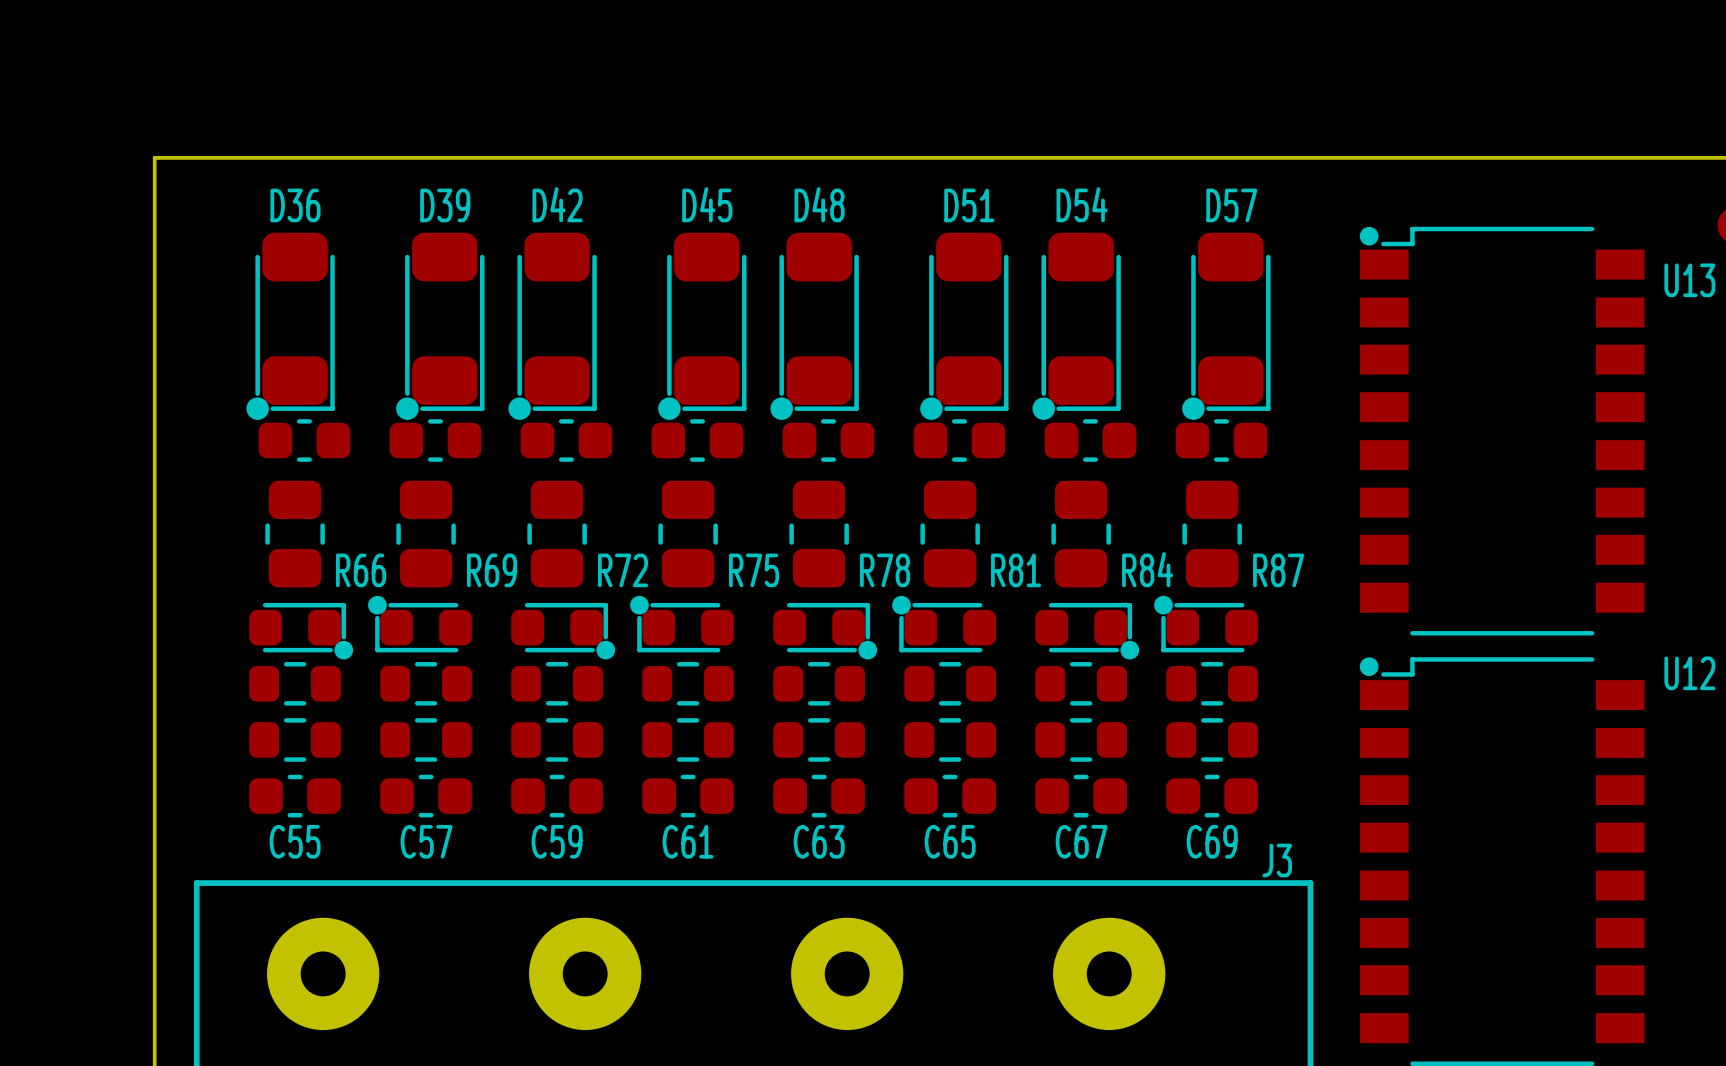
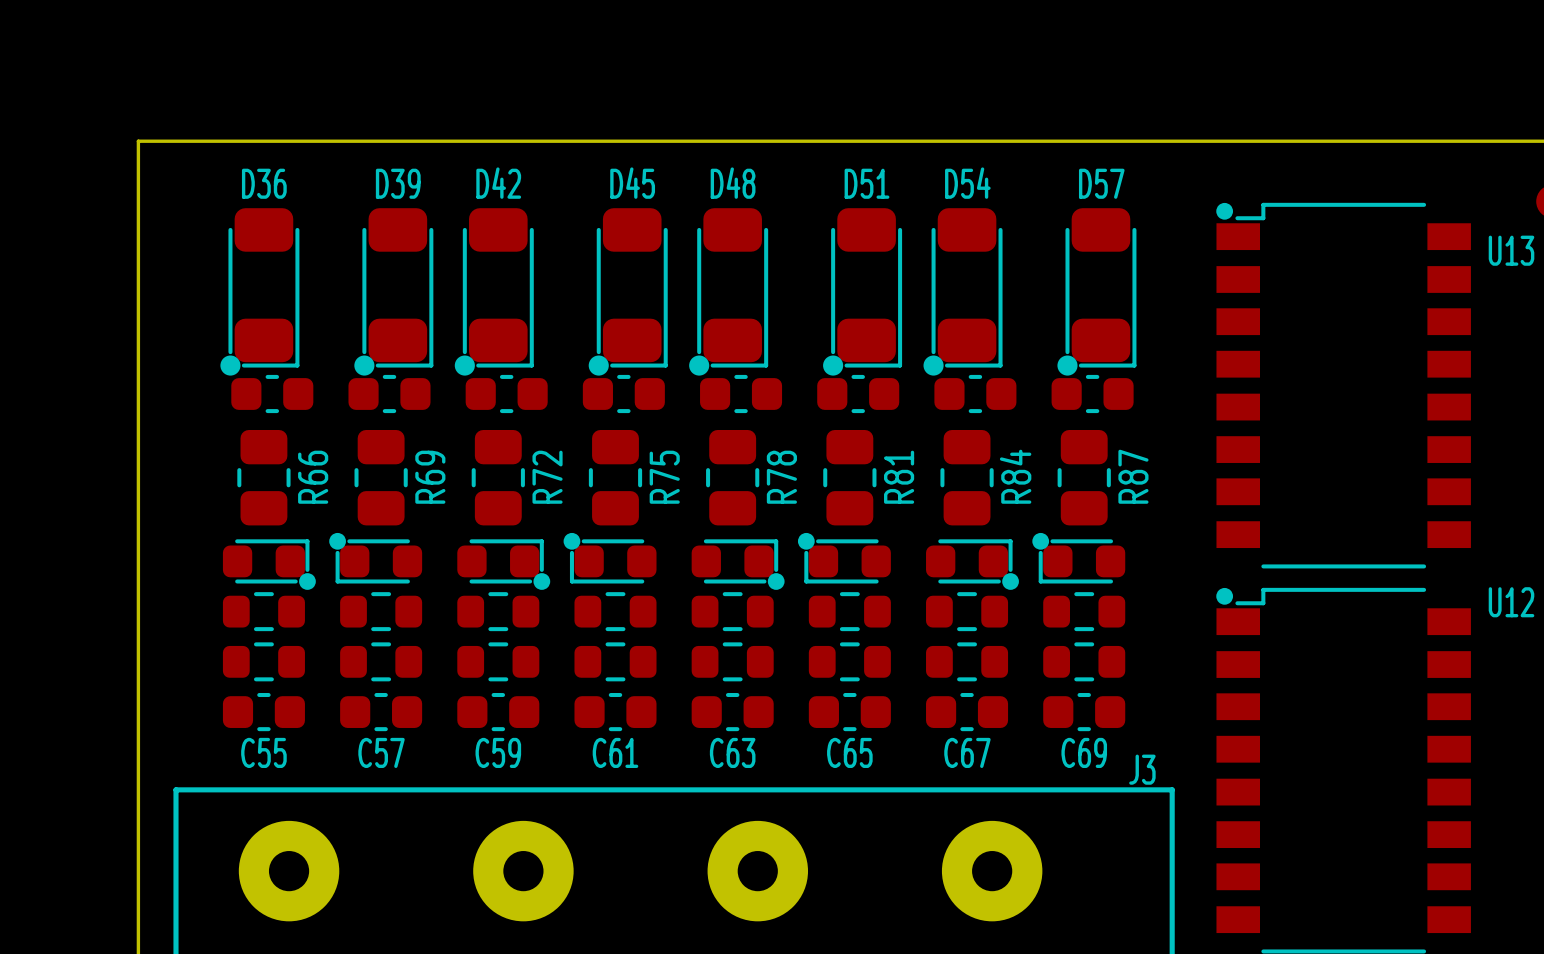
R84 name rotation: 0° (1147, 569) -> 90° counterclockwise (1015, 476)
R66 name rotation: 0° (361, 570) -> 90° counterclockwise (313, 477)
R69 name rotation: 0° (492, 570) -> 90° counterclockwise (430, 477)
R72 name rotation: 0° (623, 570) -> 90° counterclockwise (547, 477)
R75 name rotation: 0° (754, 570) -> 90° counterclockwise (664, 477)
R78 name rotation: 0° (885, 570) -> 90° counterclockwise (781, 477)
R81 name rotation: 0° (1016, 570) -> 90° counterclockwise (899, 477)
R87 name rotation: 0° (1278, 570) -> 90° counterclockwise (1133, 476)

